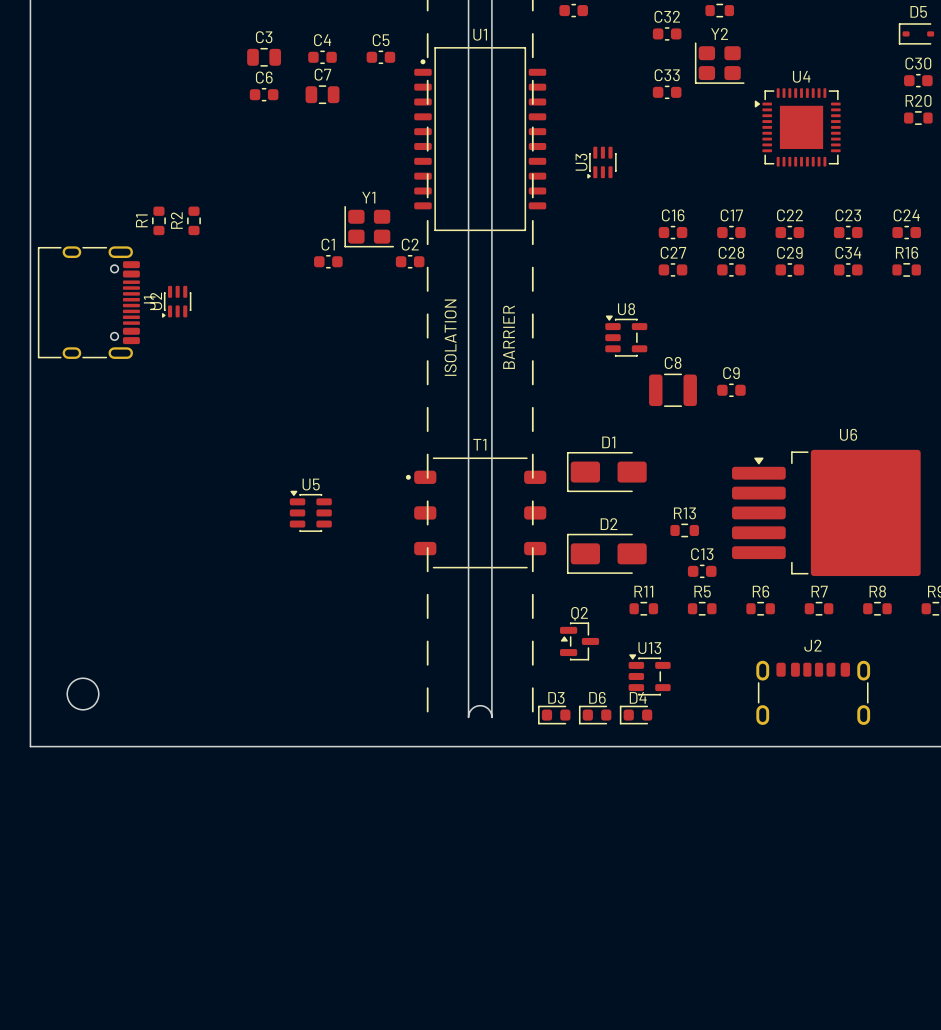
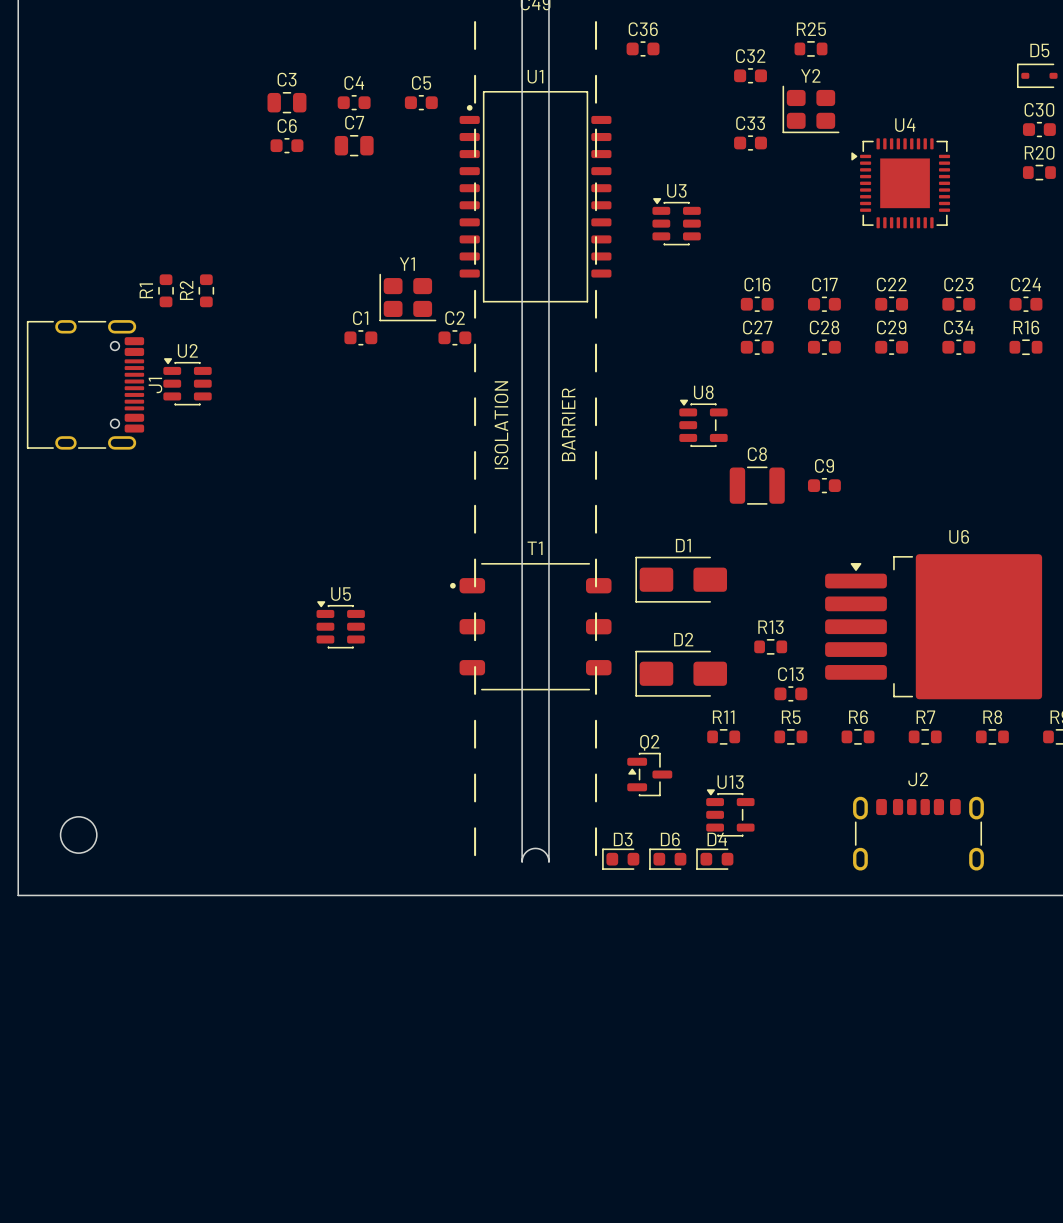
U3 footprint: [587, 146, 617, 179] -> [652, 198, 701, 246]
U3 name position: U3 (581, 162) -> U3 (676, 190)
U2 footprint: [161, 285, 192, 318] -> [163, 358, 212, 406]
U2 name position: U2 (156, 301) -> U2 (187, 350)

